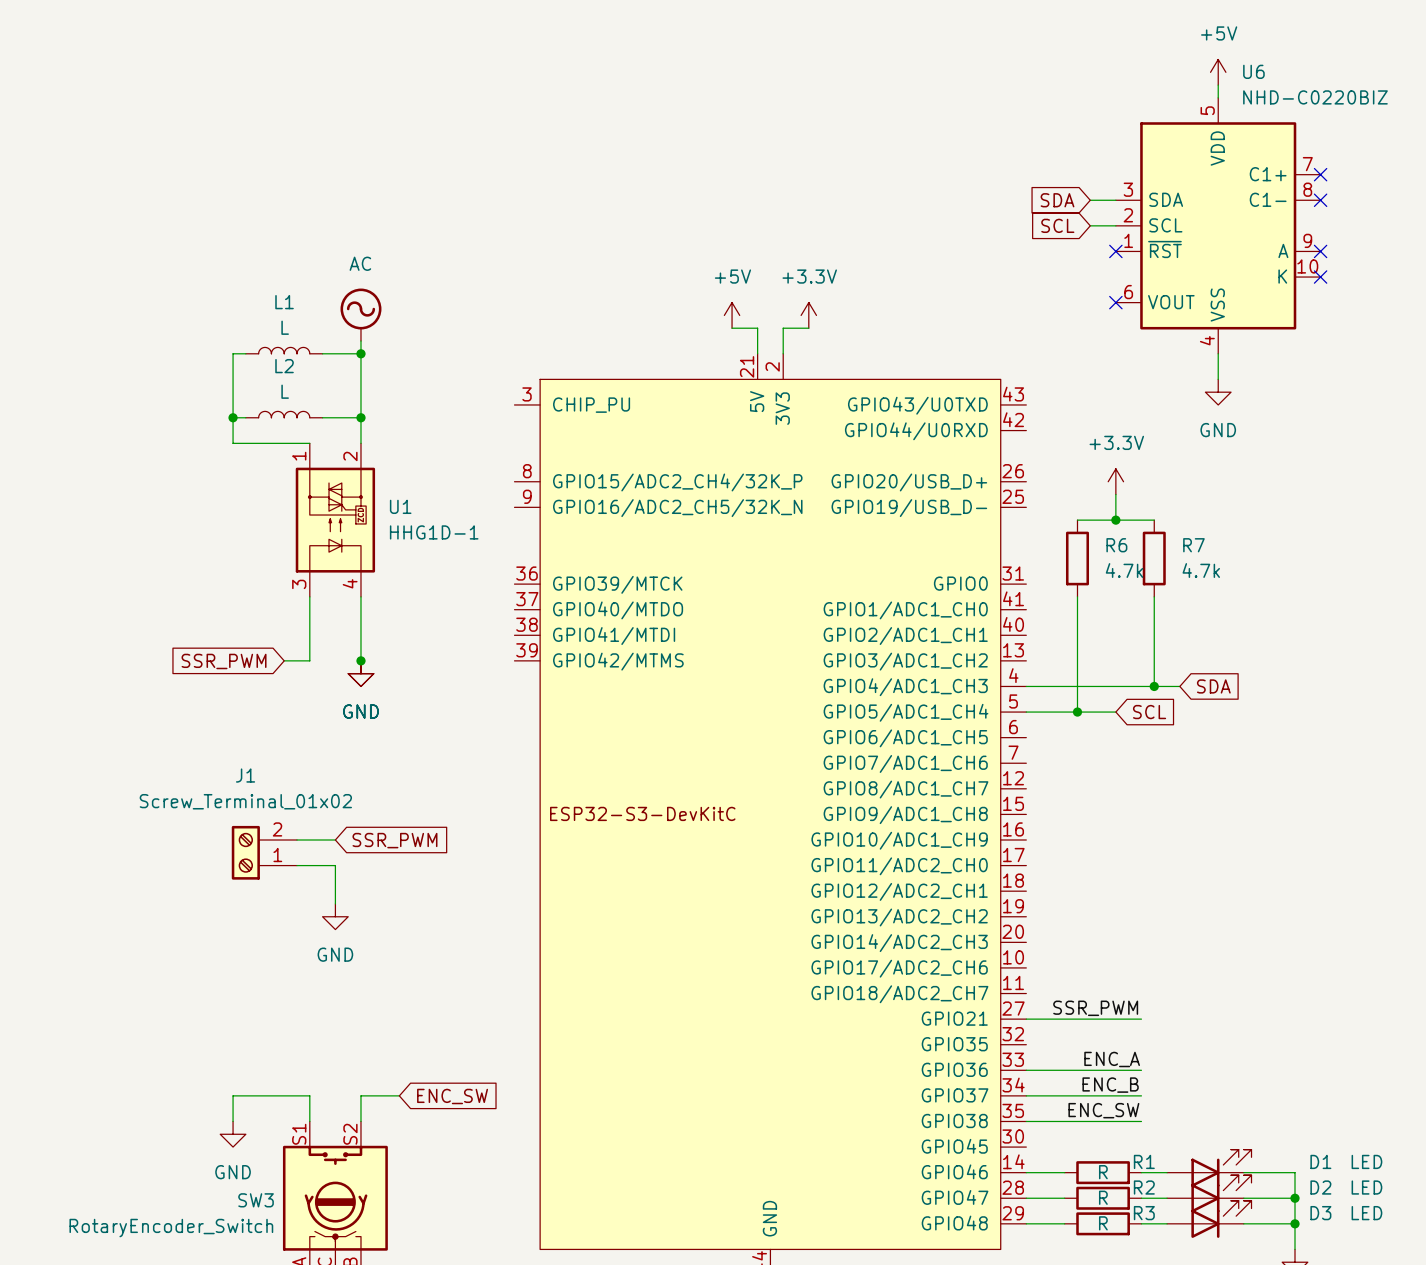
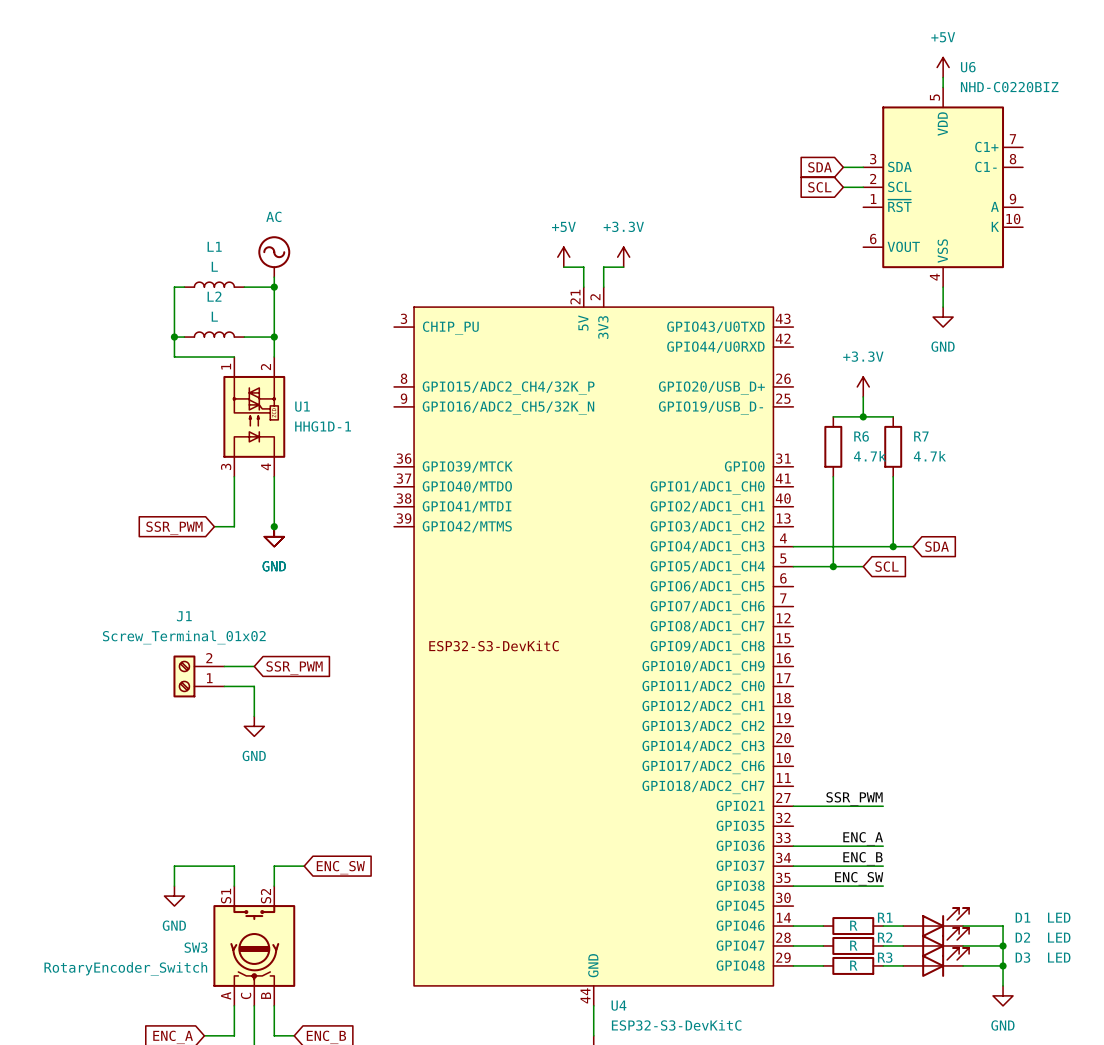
no-connect mark: (1320, 174) -> none
no-connect mark: (1320, 200) -> none
no-connect mark: (1115, 251) -> none
no-connect mark: (1320, 251) -> none
no-connect mark: (1320, 277) -> none
no-connect mark: (1115, 302) -> none

